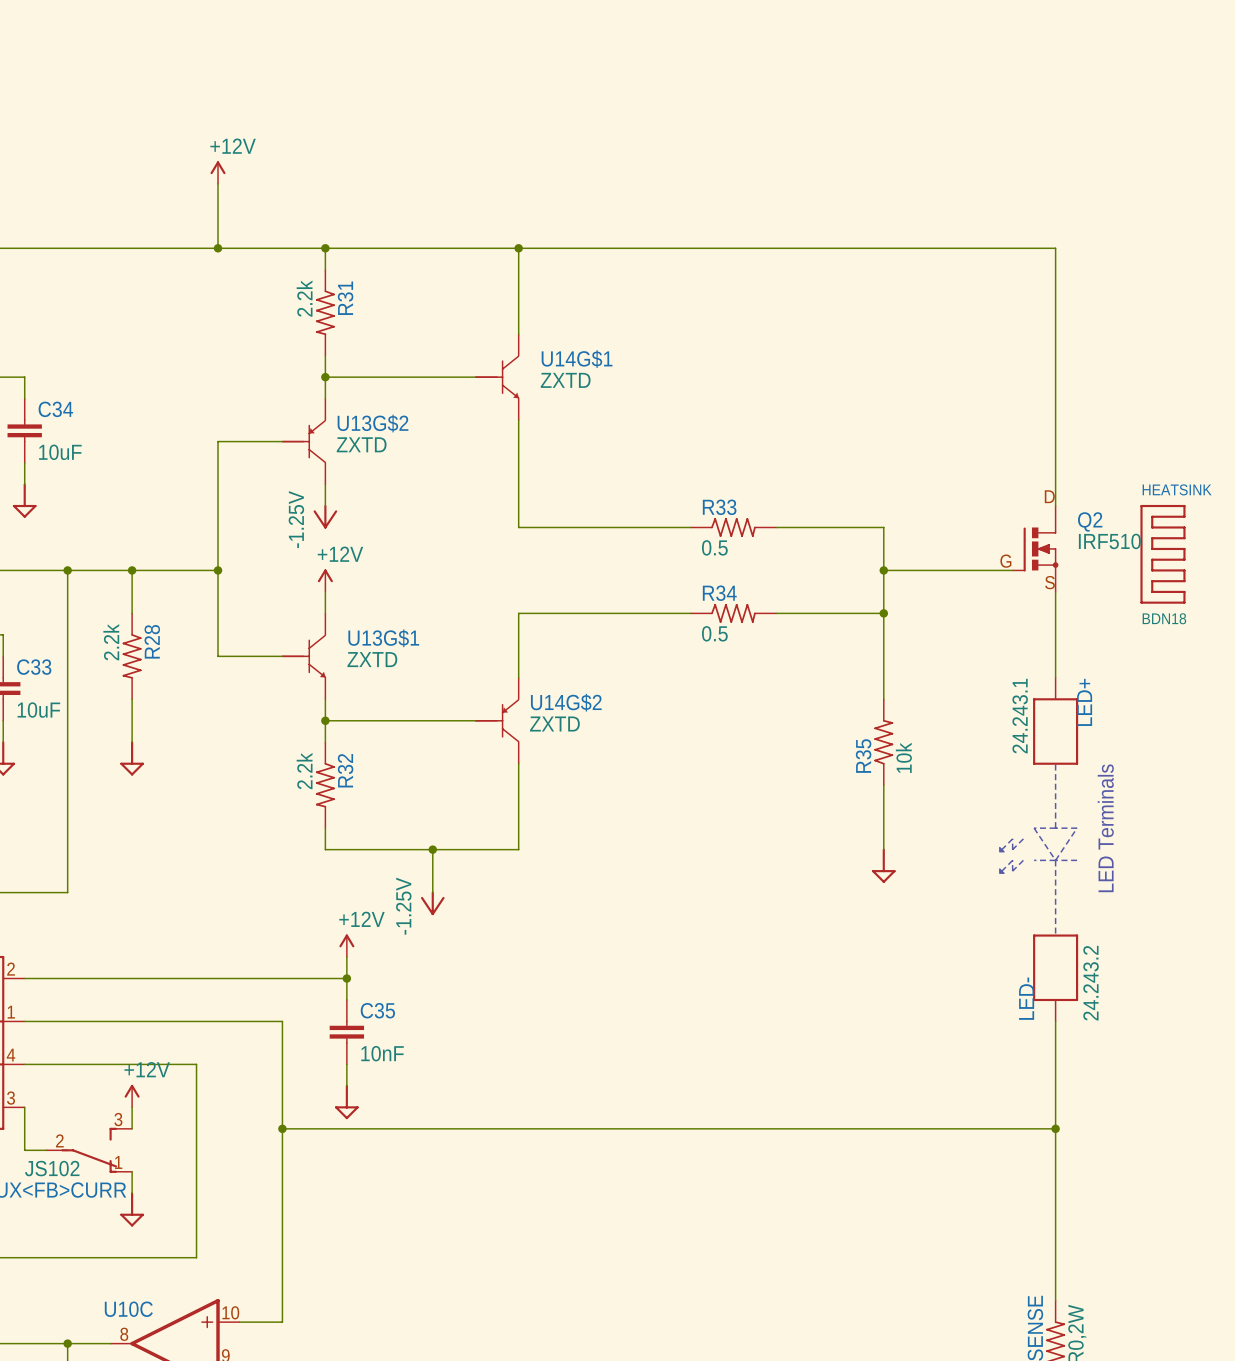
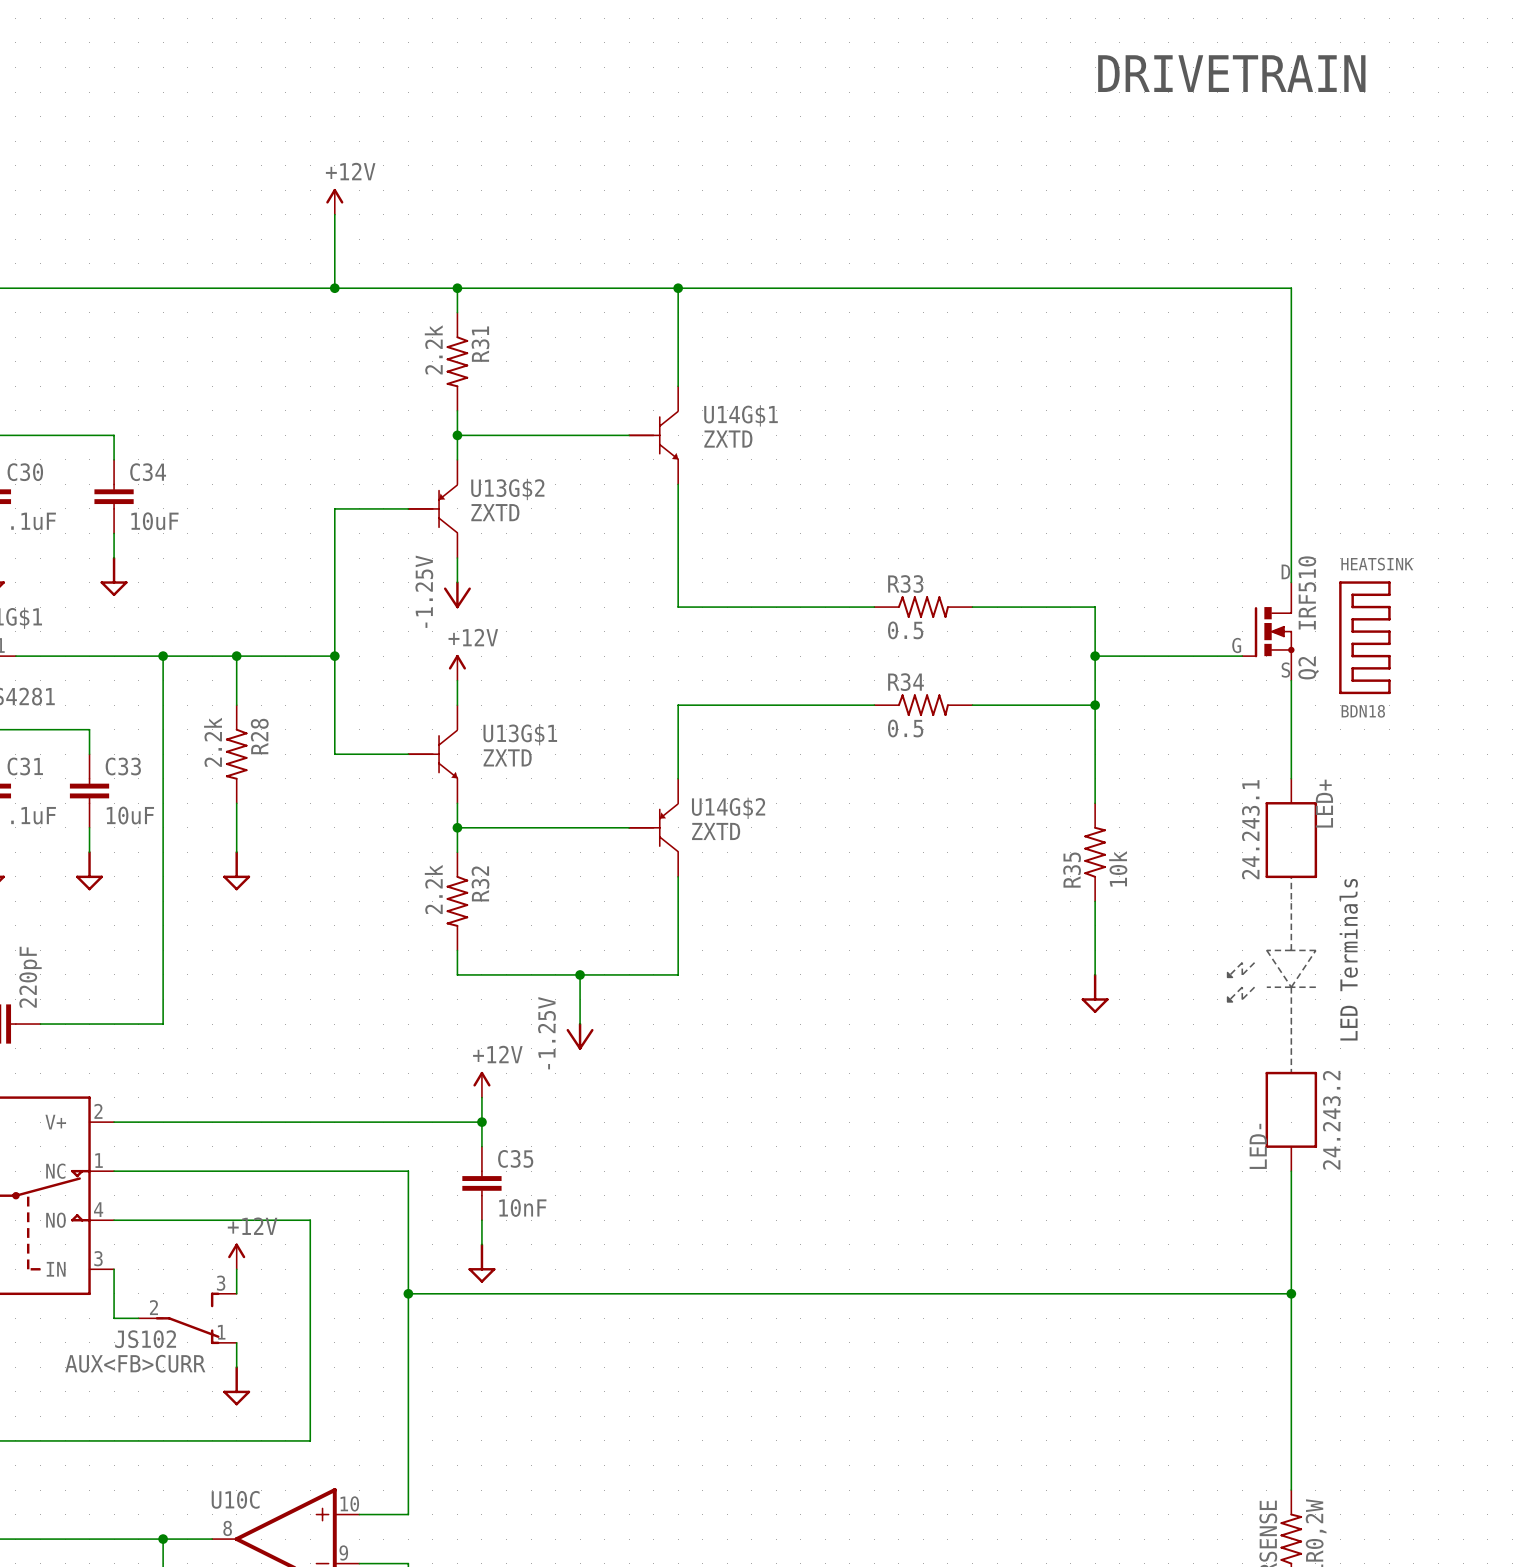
text: none -> DRIVETRAIN (1231, 73)
Q2 name rotation: 0° (1090, 521) -> 90° counterclockwise (1308, 668)
Q2 name position: Q2 (1090, 521) -> Q2 (1308, 668)
Q2 value rotation: 0° (1109, 541) -> 90° counterclockwise (1307, 592)
HEATSINK position: (1162, 554) -> (1364, 637)

